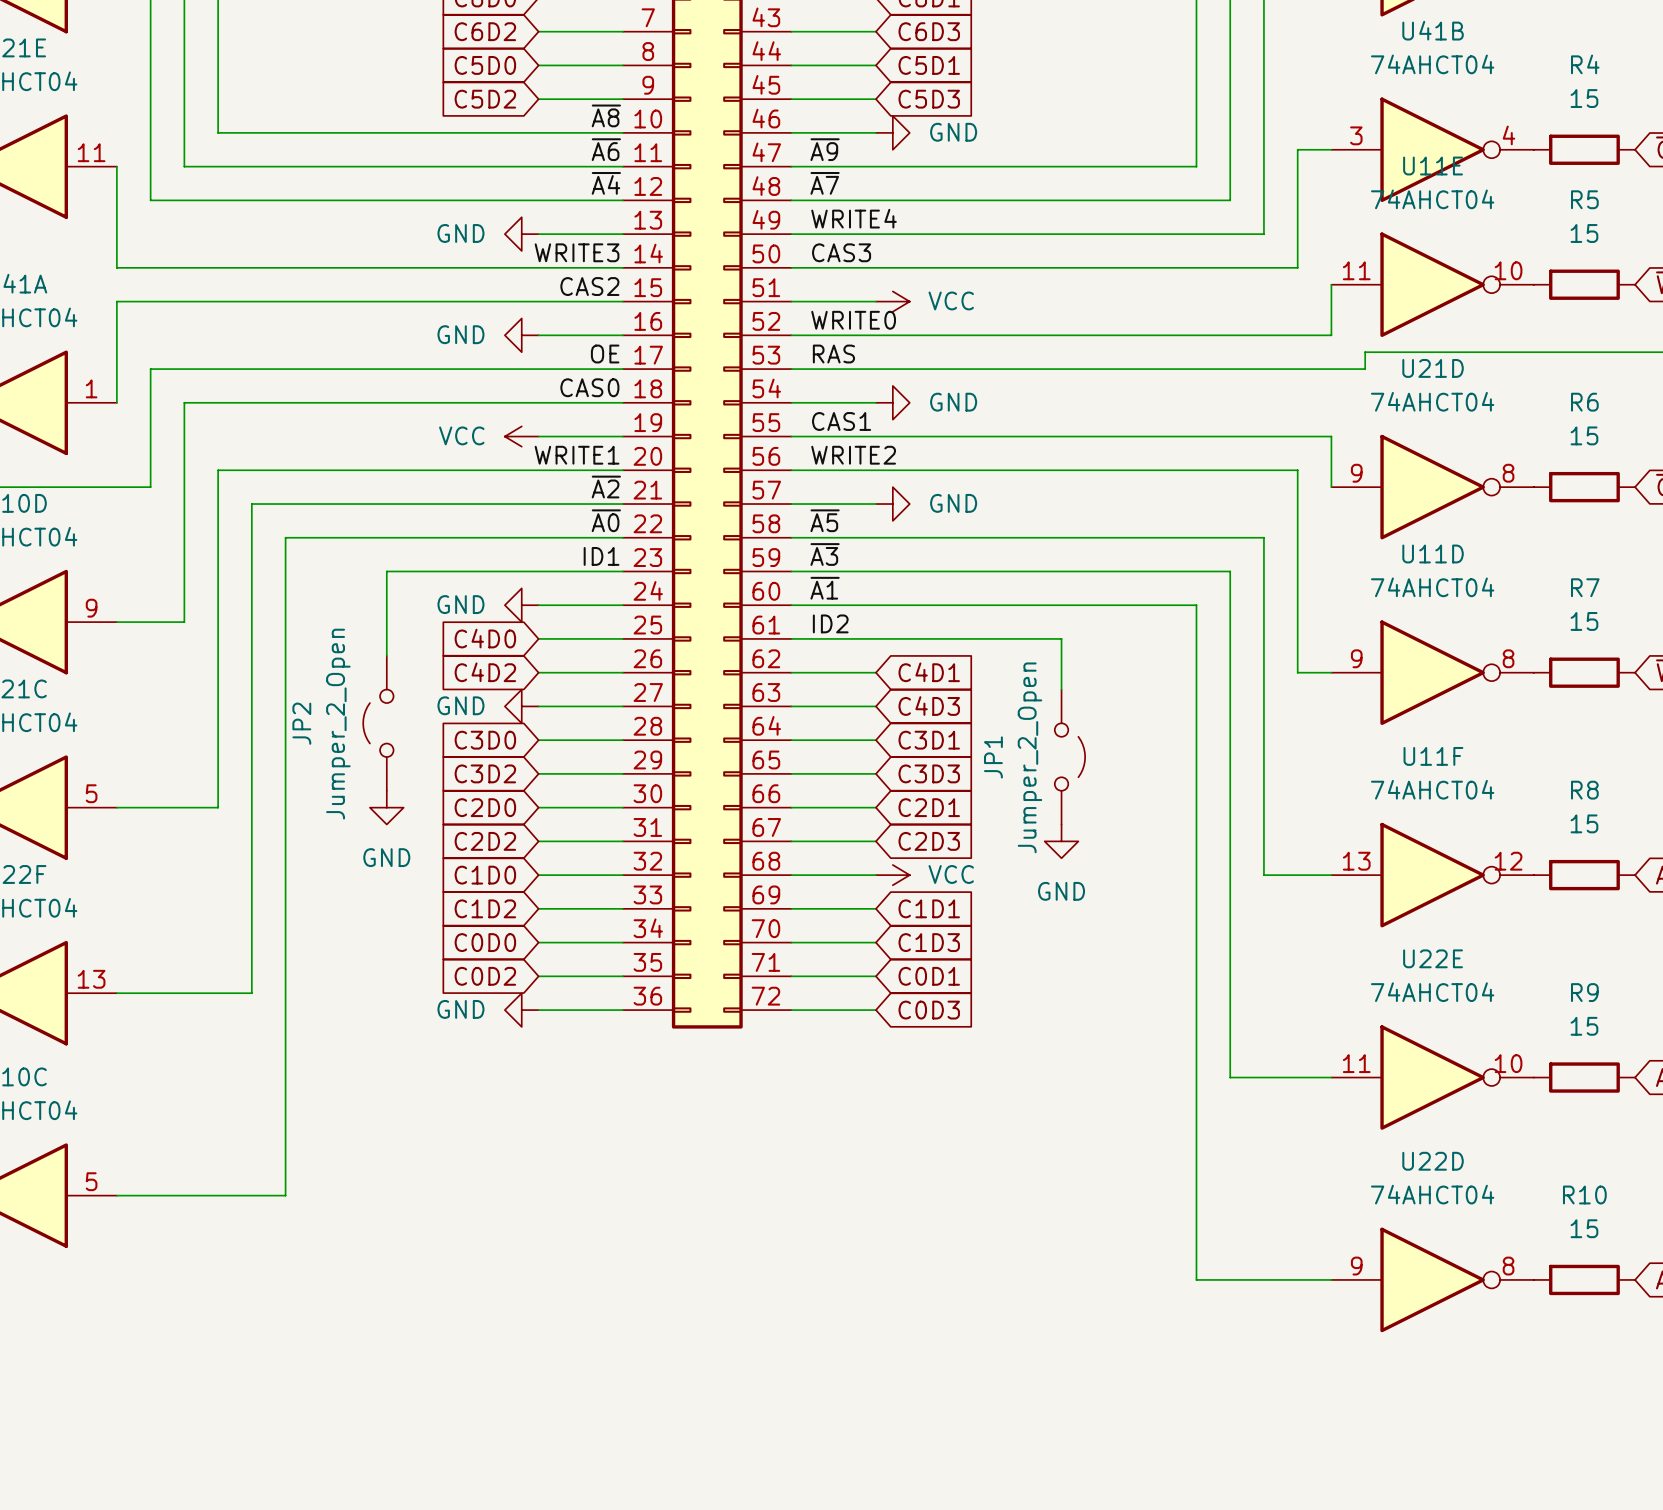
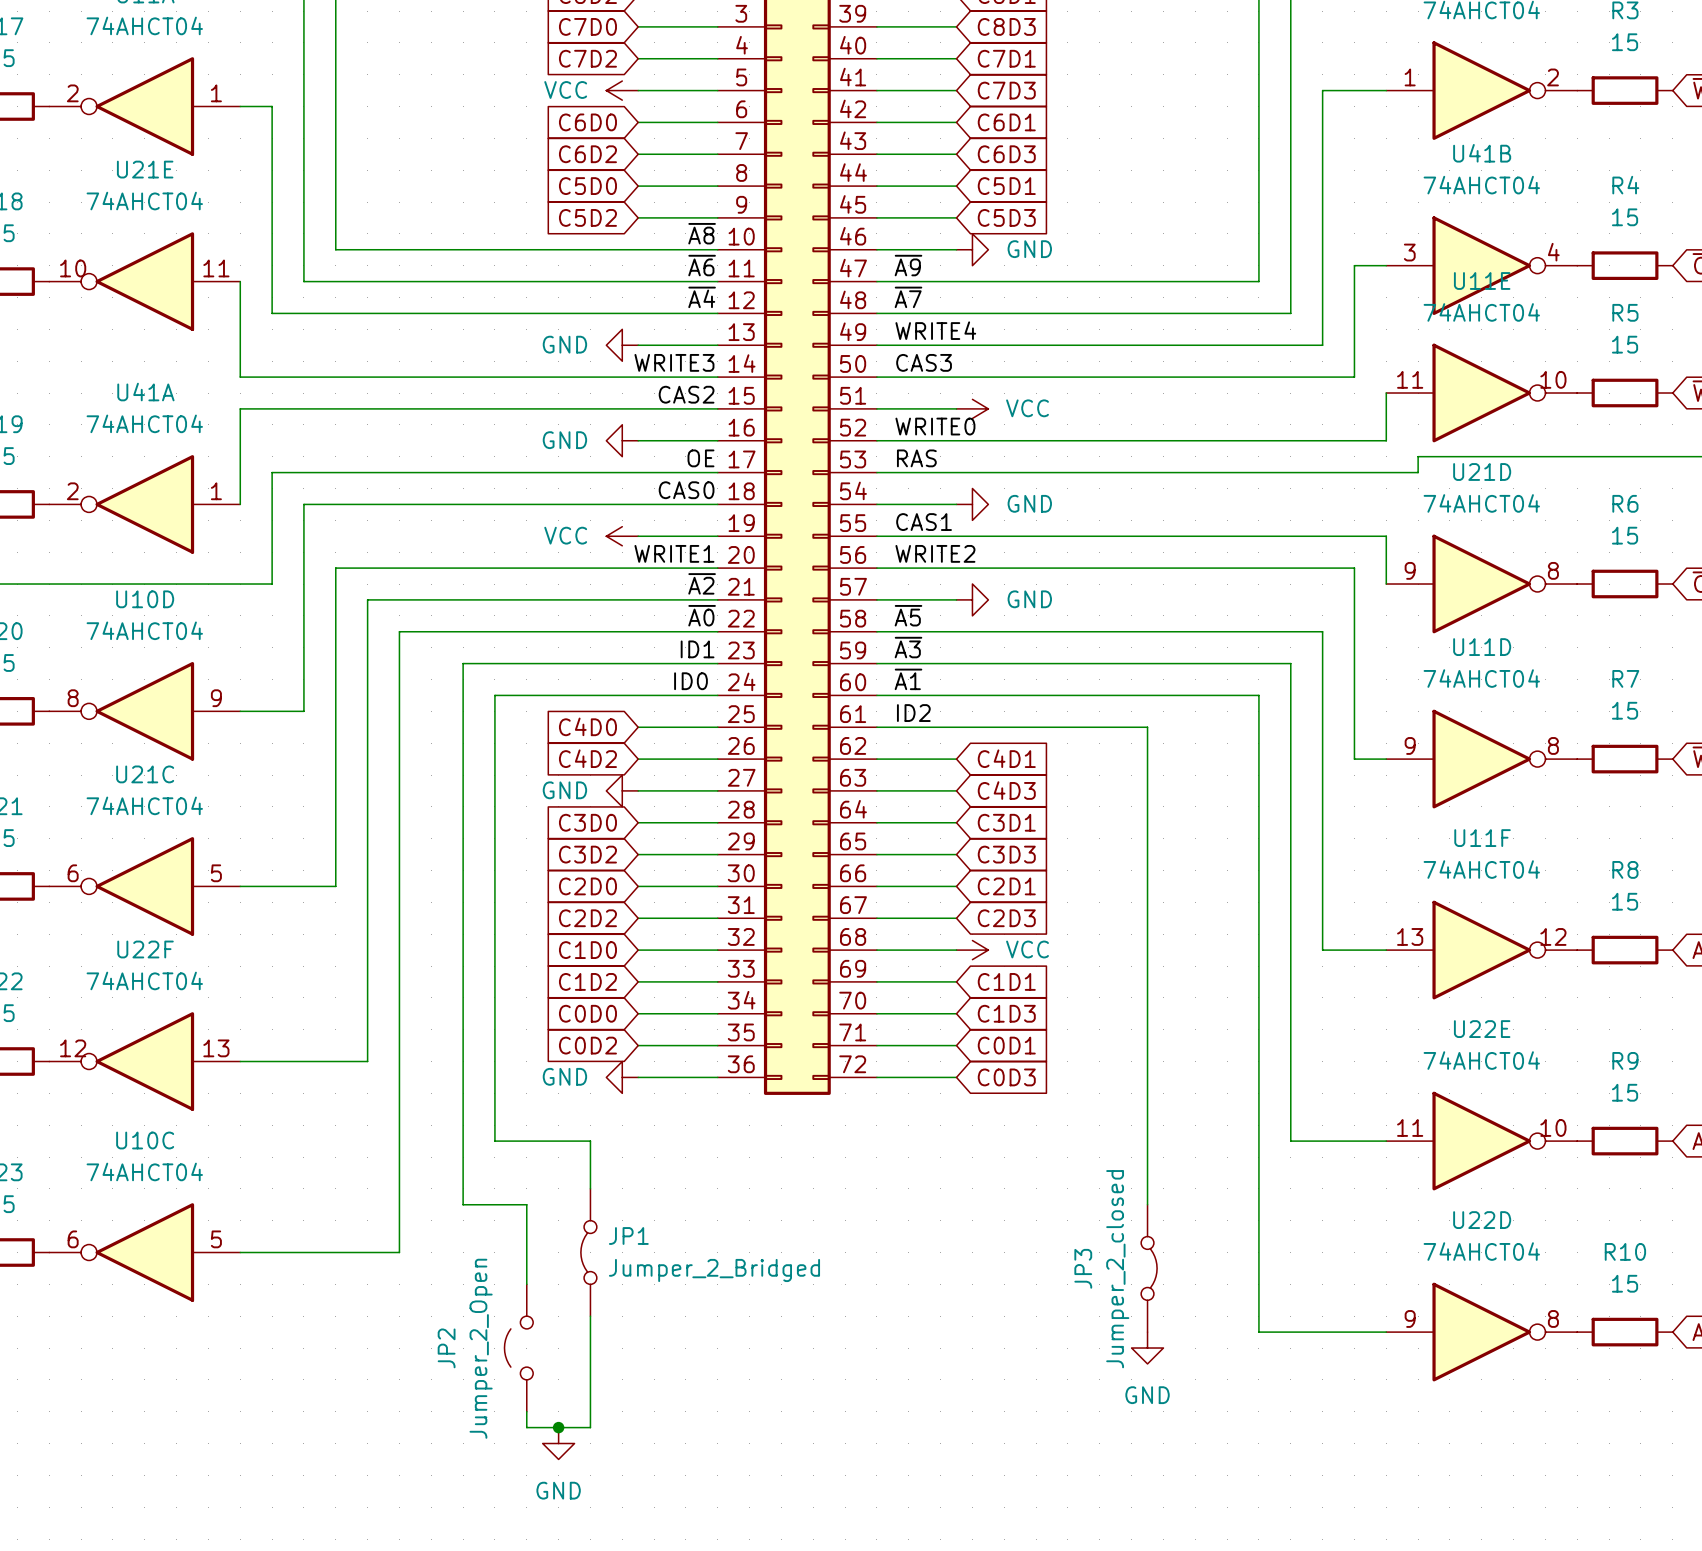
wire: (386, 571) (386, 605) -> (638, 695) (494, 695)
wire: none -> (494, 663) (463, 663) (463, 1204) (526, 1204) (526, 1284)
label: none -> ID0 (690, 681)
power symbol: GND (521, 605) -> none
wire: (1061, 638) (1061, 689) -> (1131, 727) (1147, 727) (1147, 1204)
wire: none -> (494, 743) (494, 1141) (590, 1141) (590, 1188)
JP1 symbol: [1054, 689, 1086, 825] -> [580, 1188, 597, 1317]
JP2 position: (378, 723) -> (518, 1348)
JP1 name position: JP1 (993, 757) -> JP1 (628, 1235)
JP1 value: Jumper_2_Open (1029, 757) -> Jumper_2_Bridged (714, 1270)
power symbol: GND (386, 807) -> none
power symbol: GND (1061, 841) -> none
JP3: none -> Jumper_2_closed (1149, 1268)
wire: none -> (590, 1316) (590, 1427) (526, 1427) (526, 1411)
power symbol: none -> GND (1147, 1348)
junction: none -> (558, 1427)
power symbol: none -> GND (558, 1443)

